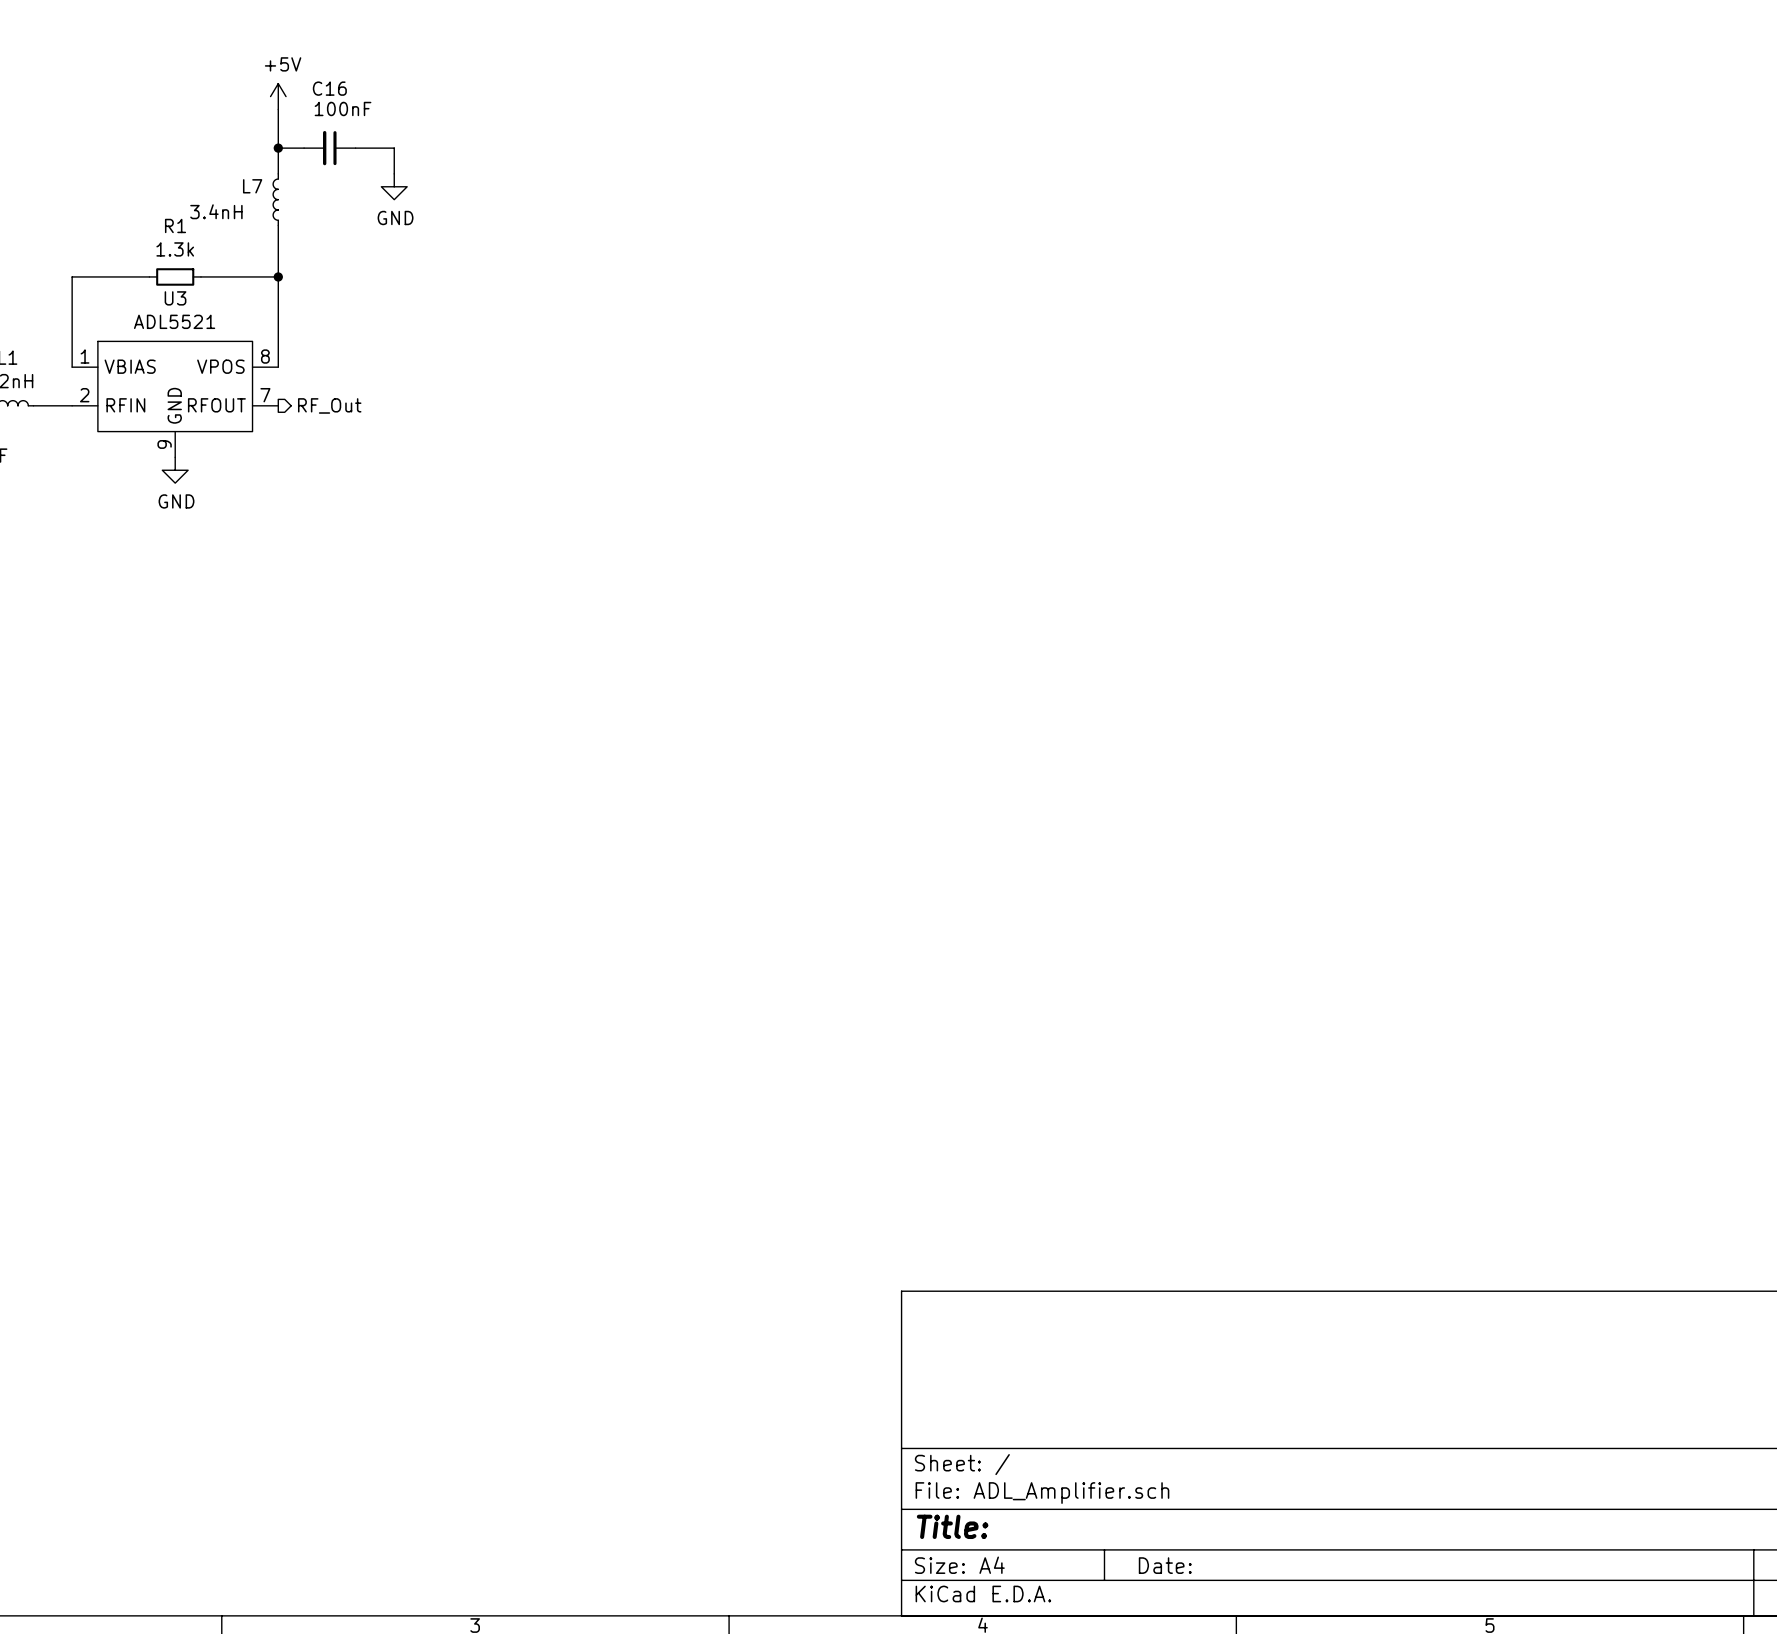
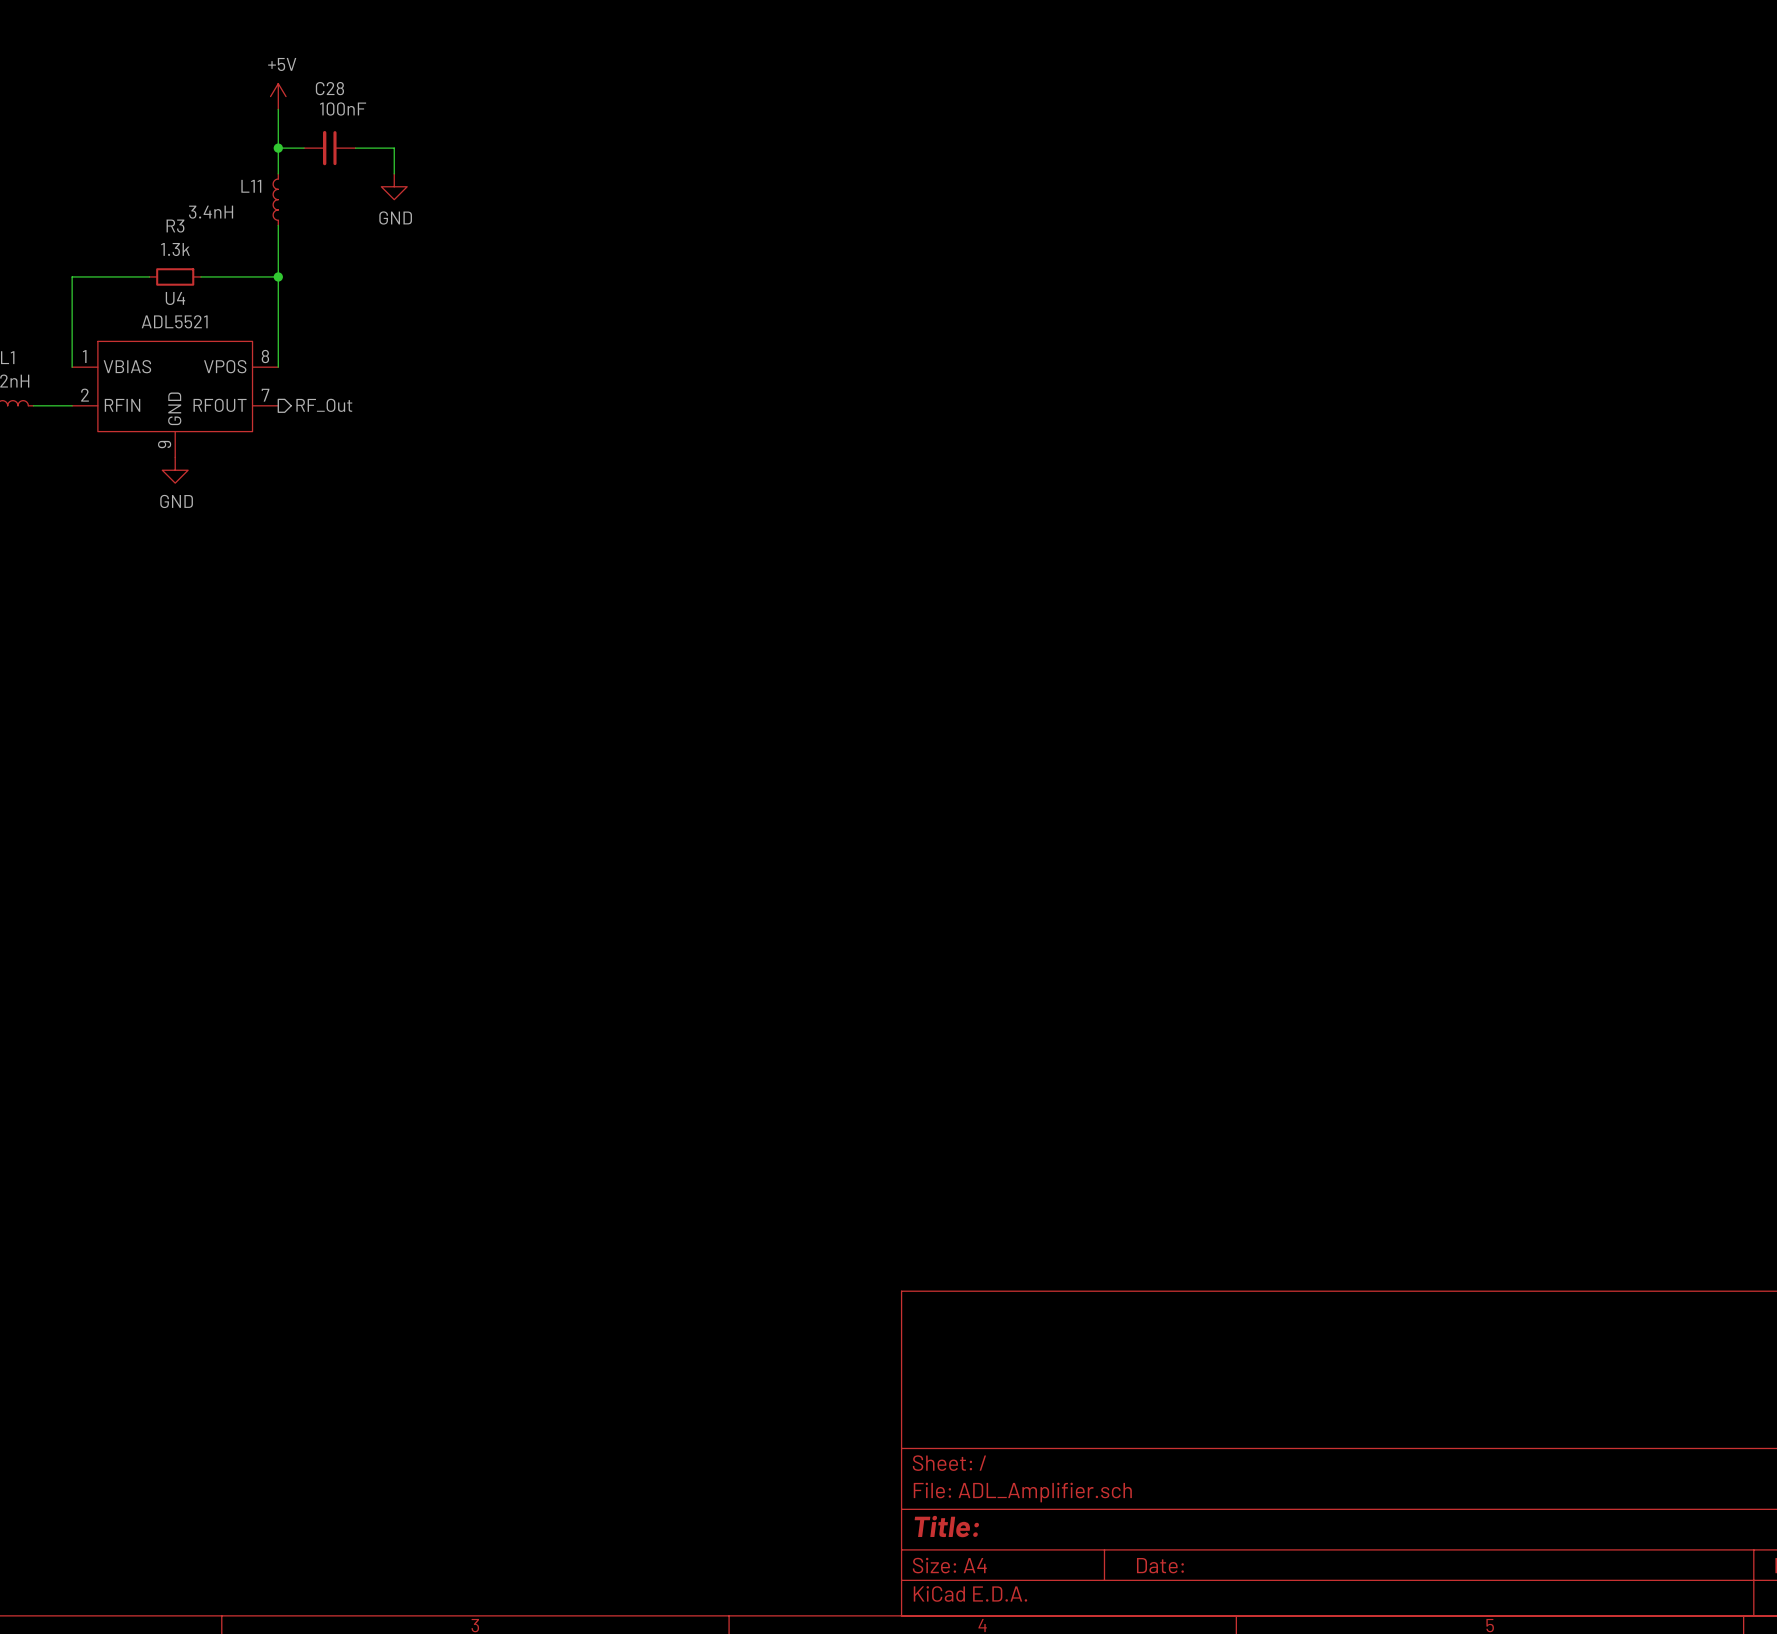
C16 name: C16 (329, 88) -> C28 (329, 88)
L7 name: L7 (252, 186) -> L11 (251, 186)
R1 name: R1 (175, 225) -> R3 (175, 226)
U3 name: U3 (175, 298) -> U4 (175, 298)

